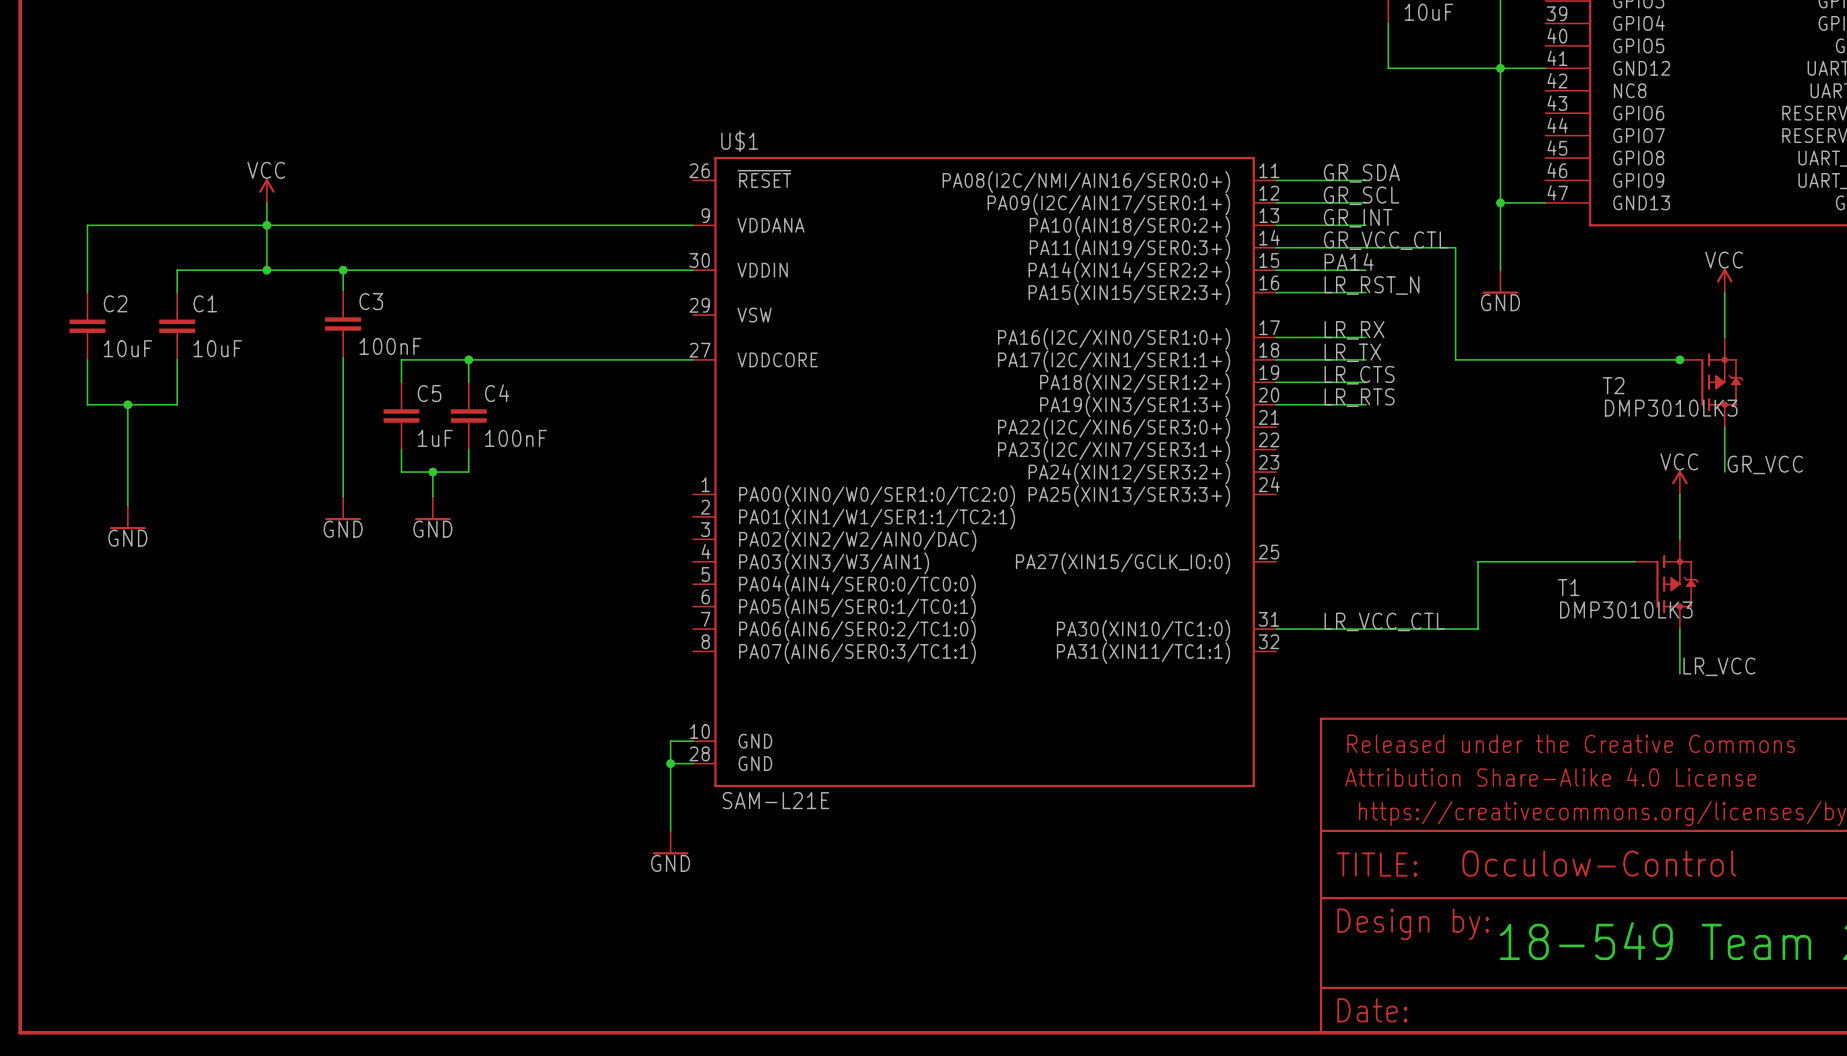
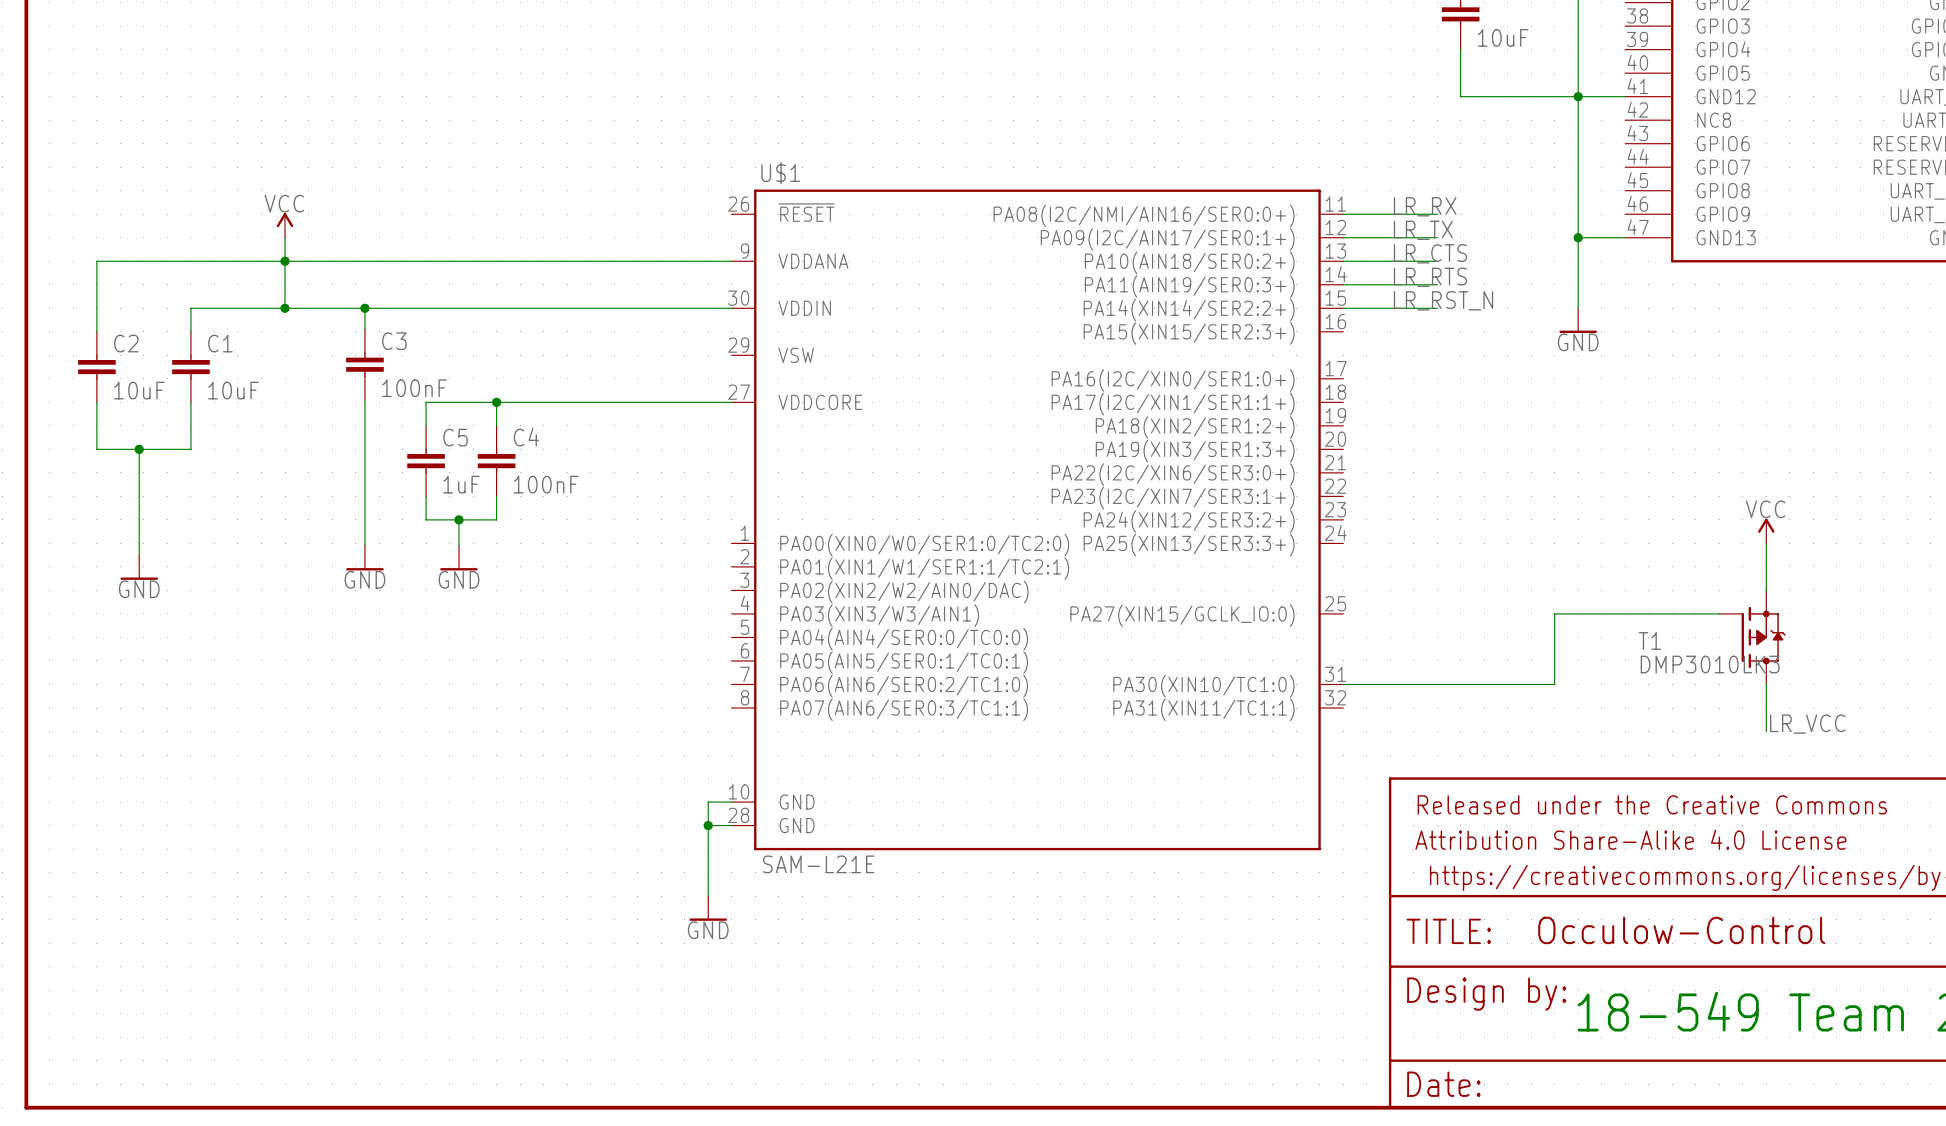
label: GR_SDA (1361, 173) -> LR_RX (1425, 206)
label: GR_SCL (1361, 195) -> LR_TX (1423, 230)
label: GR_INT (1358, 218) -> LR_CTS (1430, 253)
label: GR_VCC_CTL (1385, 240) -> LR_RTS (1430, 277)
wire: (1365, 247) (1455, 247) (1455, 359) (1679, 359) -> none
label: PA14 (1349, 261) -> LR_RST_N (1443, 300)
power symbol: VCC (1724, 280) -> none
label: LR_RST_N (1372, 285) -> none
wire: (1276, 292) (1365, 292) -> none
wire: (1724, 292) (1724, 337) -> none
label: LR_RX (1354, 330) -> none
wire: (1276, 337) (1365, 337) -> none
label: LR_TX (1352, 352) -> none
wire: (1276, 359) (1365, 359) -> none
junction: (1679, 359) -> none
label: LR_CTS (1359, 375) -> none
wire: (1276, 382) (1365, 382) -> none
T2: DMP3010LK3 (1711, 382) -> none
label: LR_RTS (1359, 397) -> none
wire: (1276, 404) (1365, 404) -> none
wire: (1724, 427) (1724, 472) -> none
label: GR_VCC (1765, 464) -> none
label: LR_VCC_CTL (1384, 621) -> none

